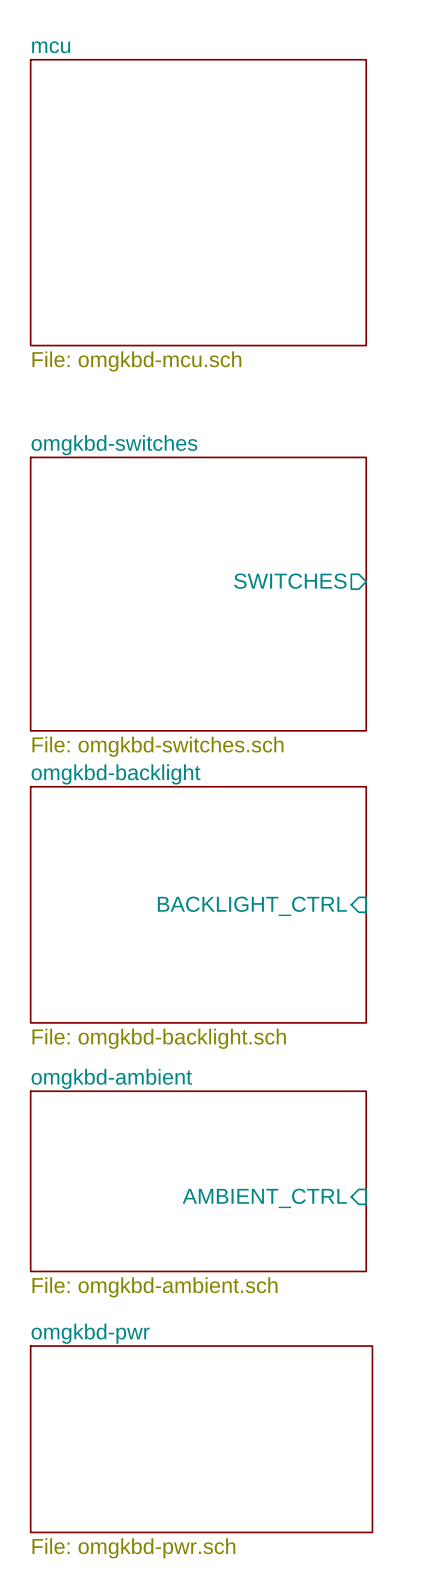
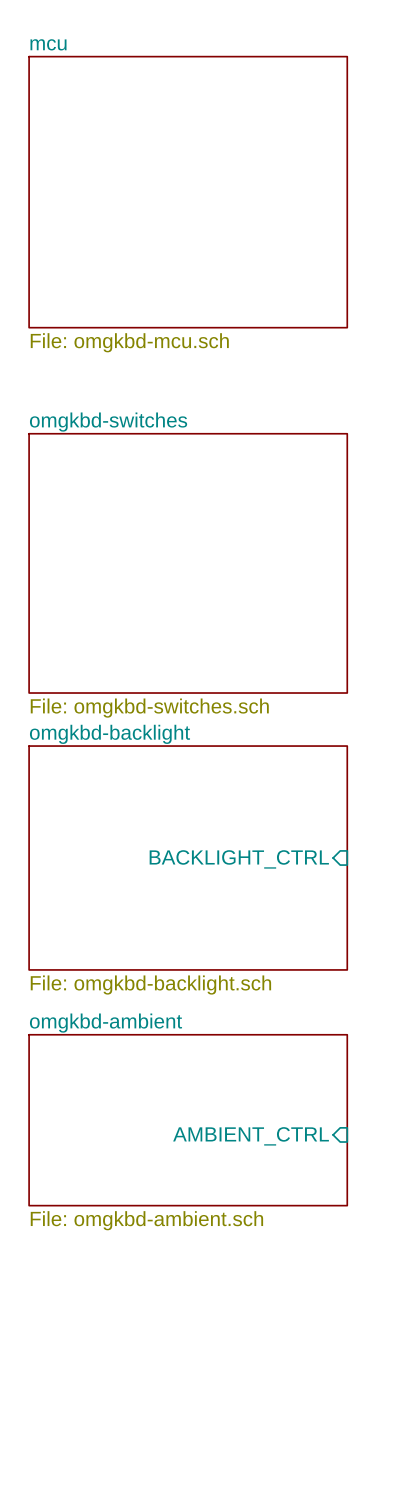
sheet pin: SWITCHES (290, 581) -> none
sheet omgkbd-pwr: File: omgkbd-pwr.sch (201, 1439) -> none

